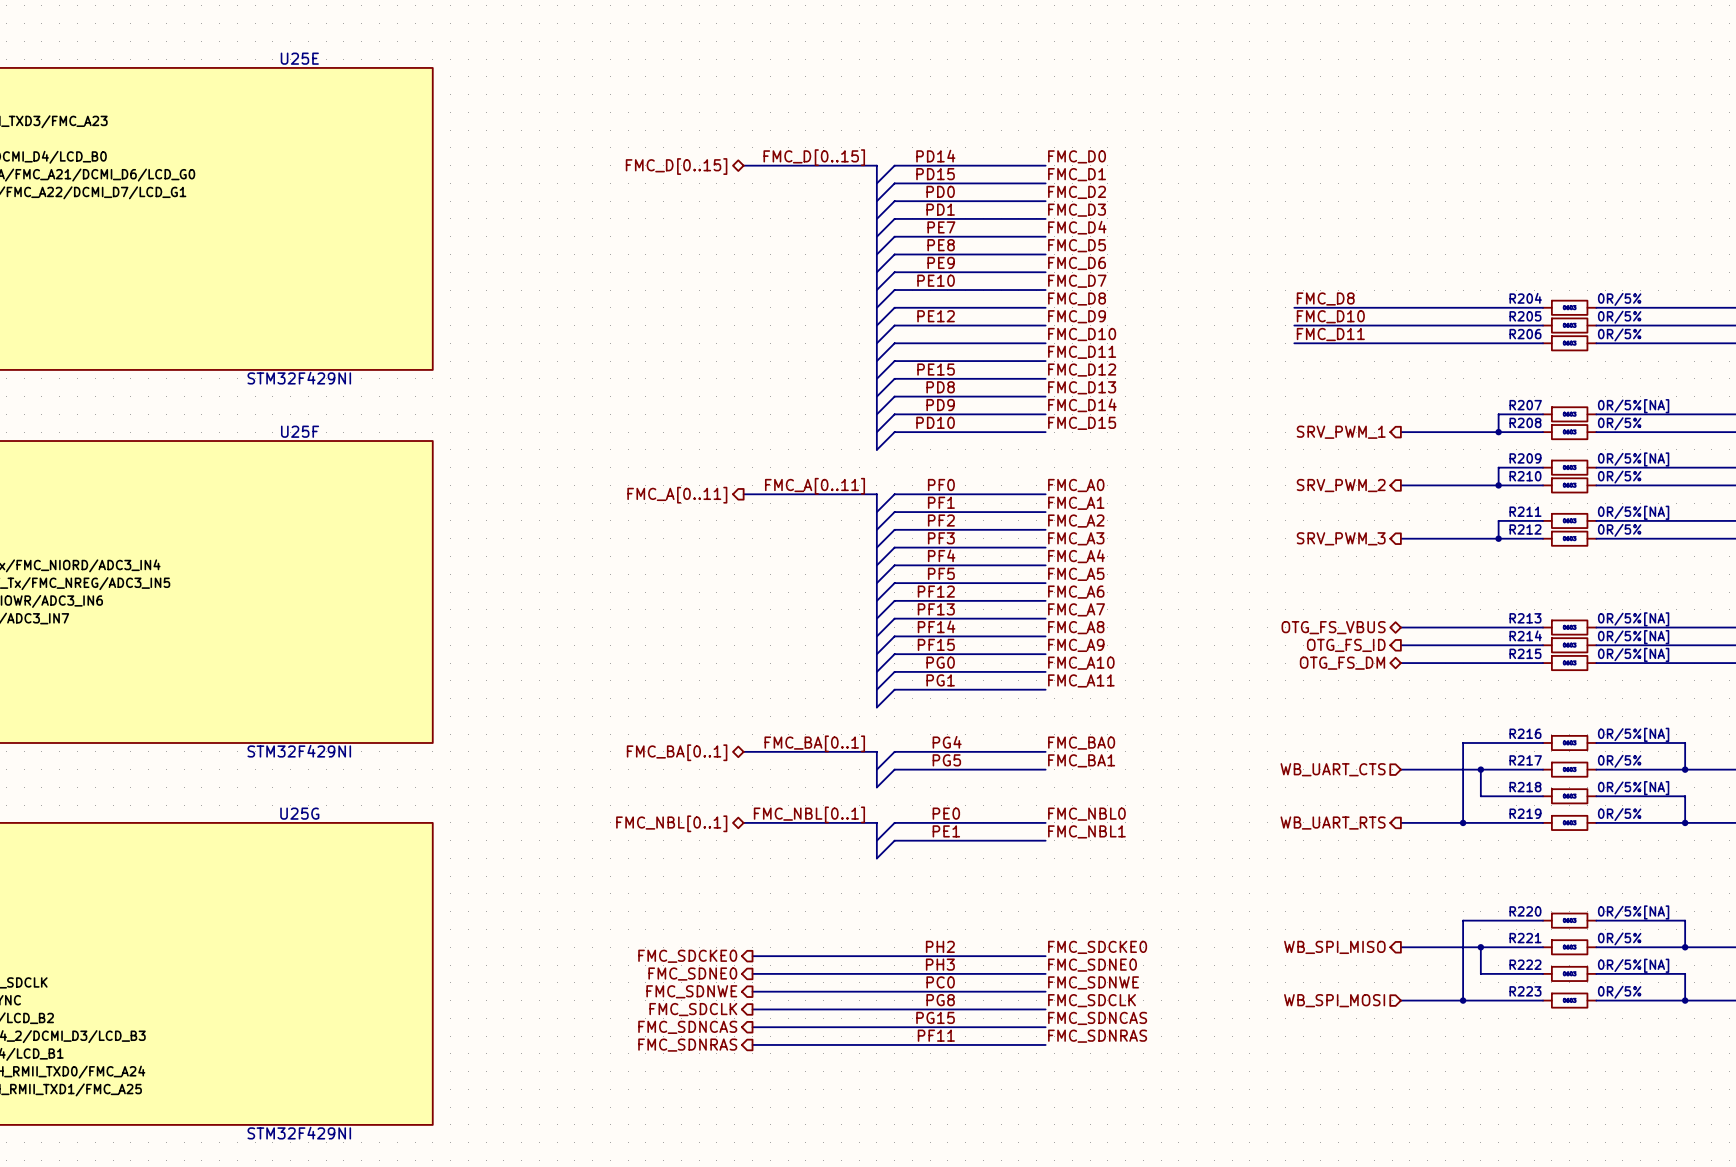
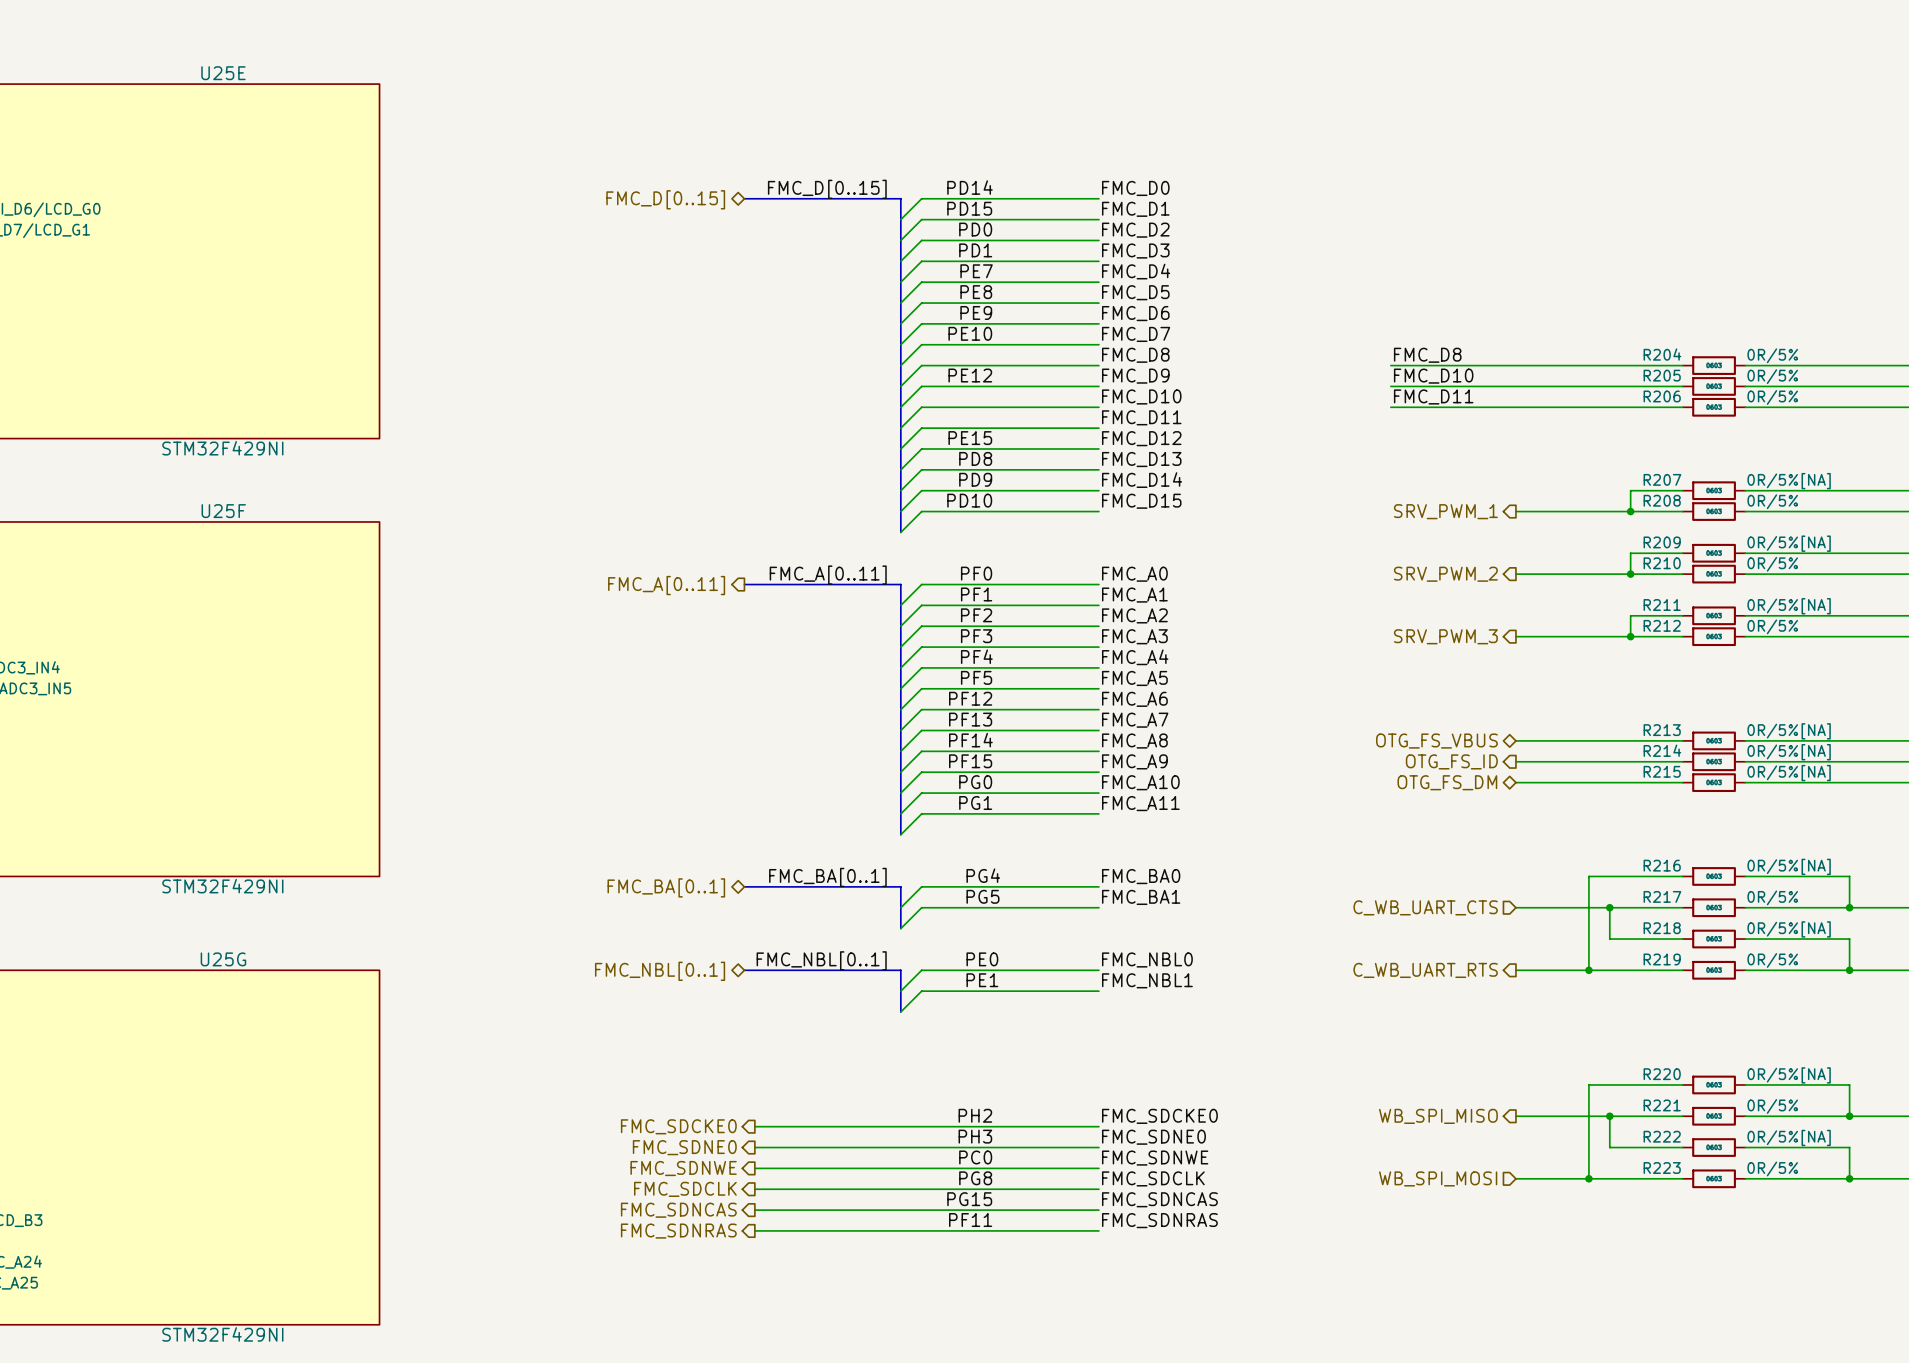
hierarchical label: WB_UART_CTS (1333, 769) -> C_WB_UART_CTS (1425, 907)
hierarchical label: WB_UART_RTS (1333, 823) -> C_WB_UART_RTS (1425, 970)

